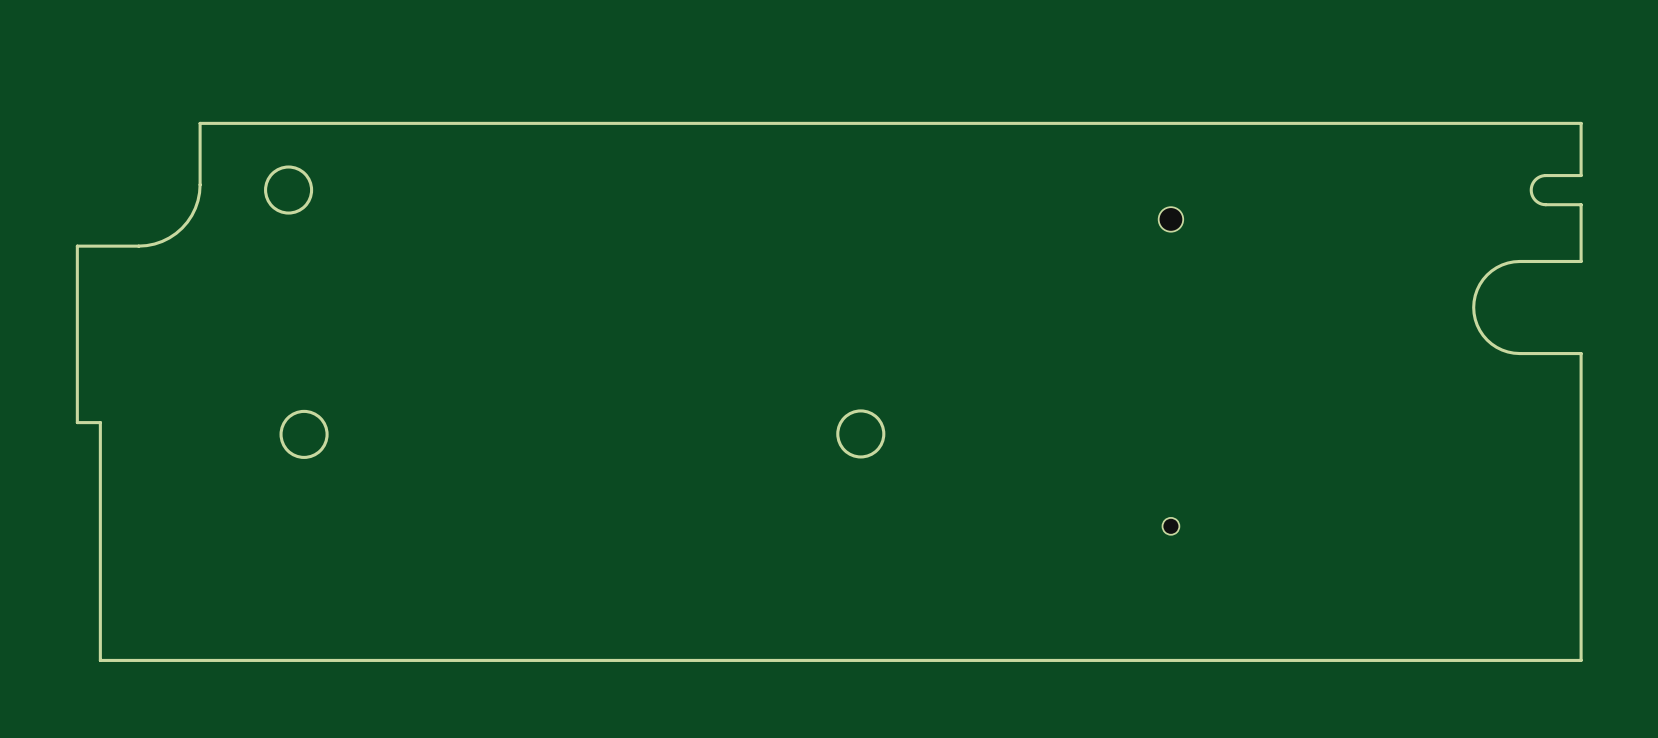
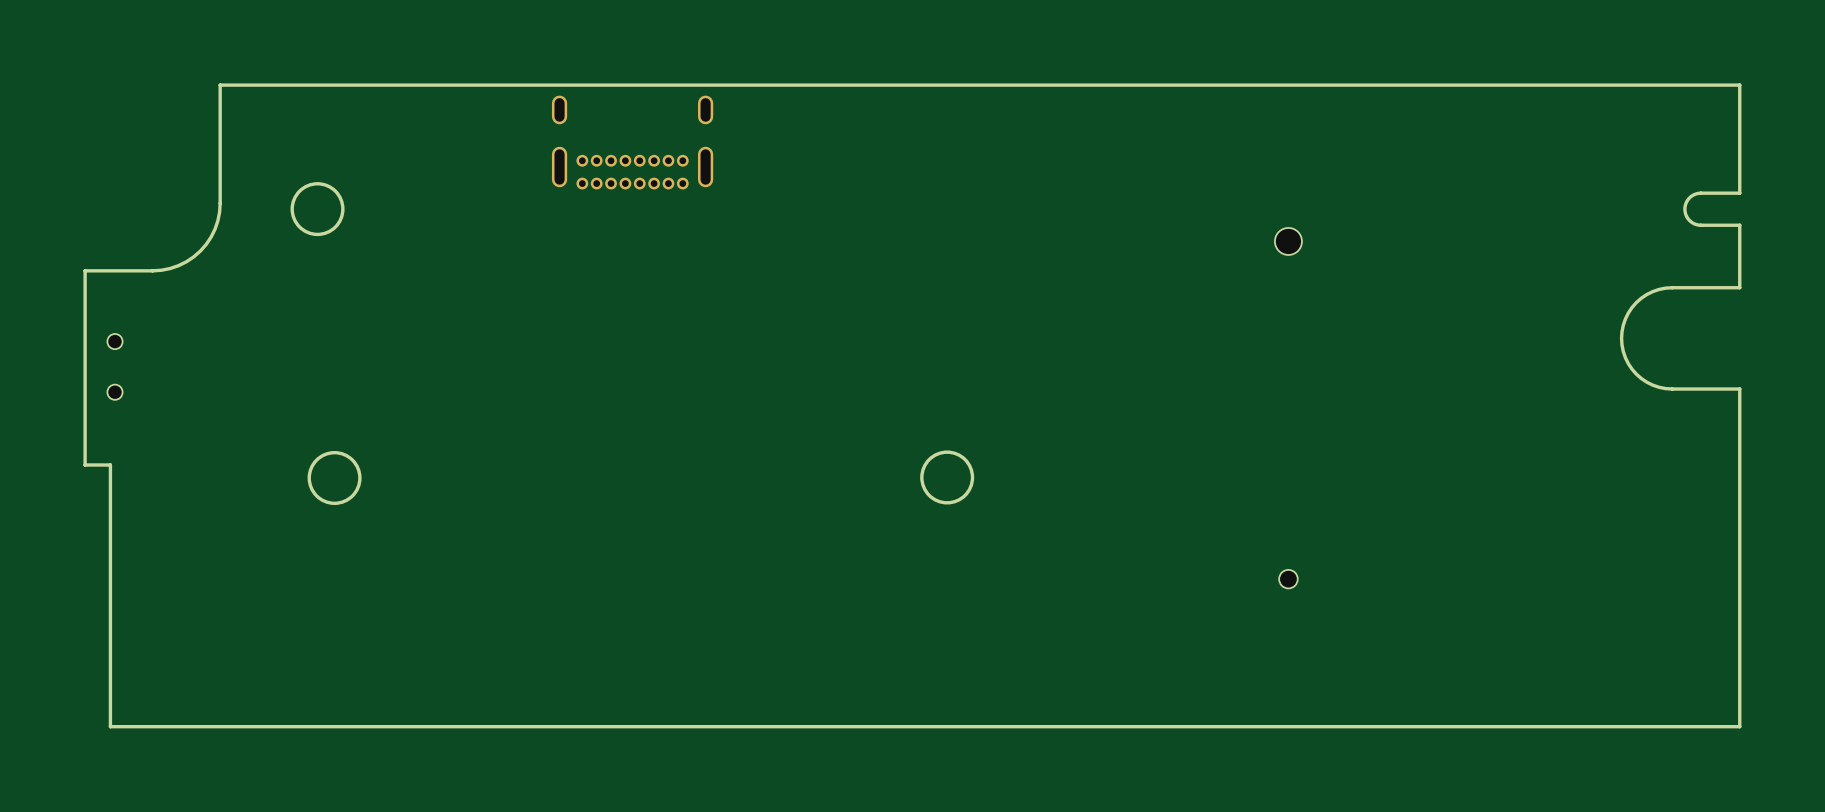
board edge: (1581, 123) (200, 123) -> (1739, 135) (1739, 85) (220, 85) (220, 135)
part: none -> (632, 142)
part: none -> (114, 366)

